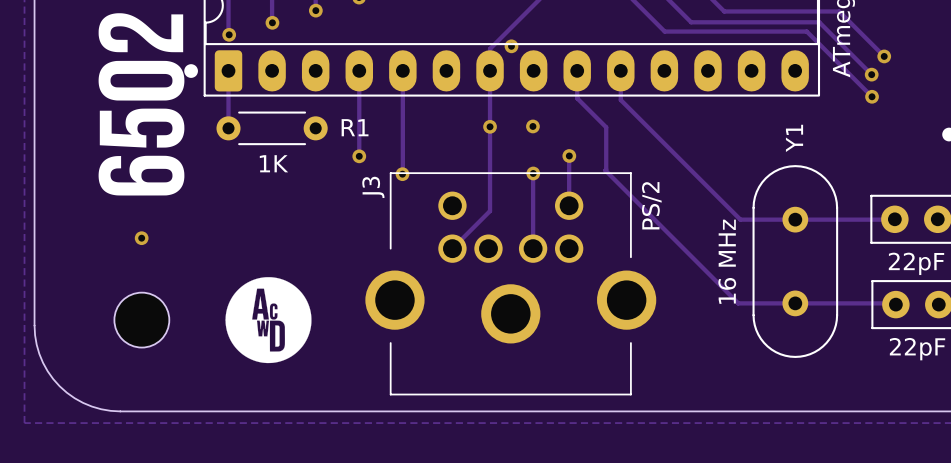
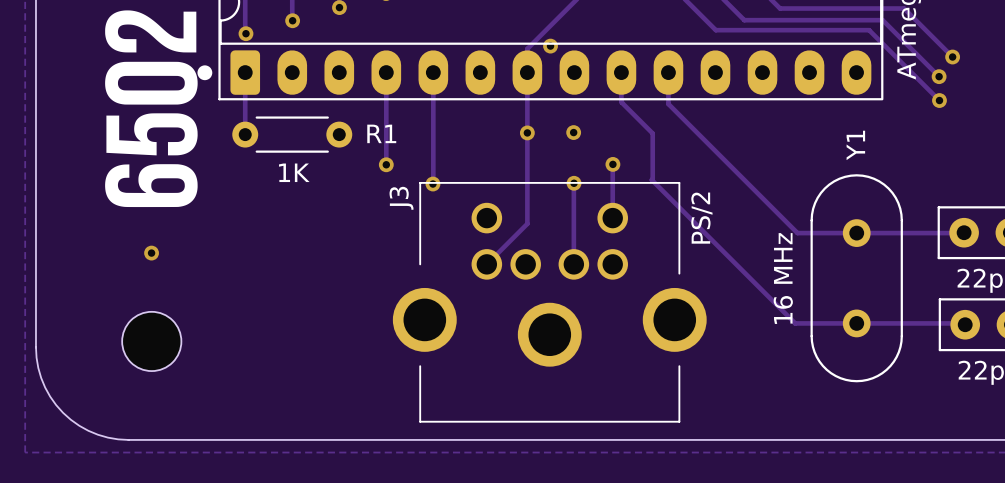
drawing: [225, 277, 312, 364] -> none

